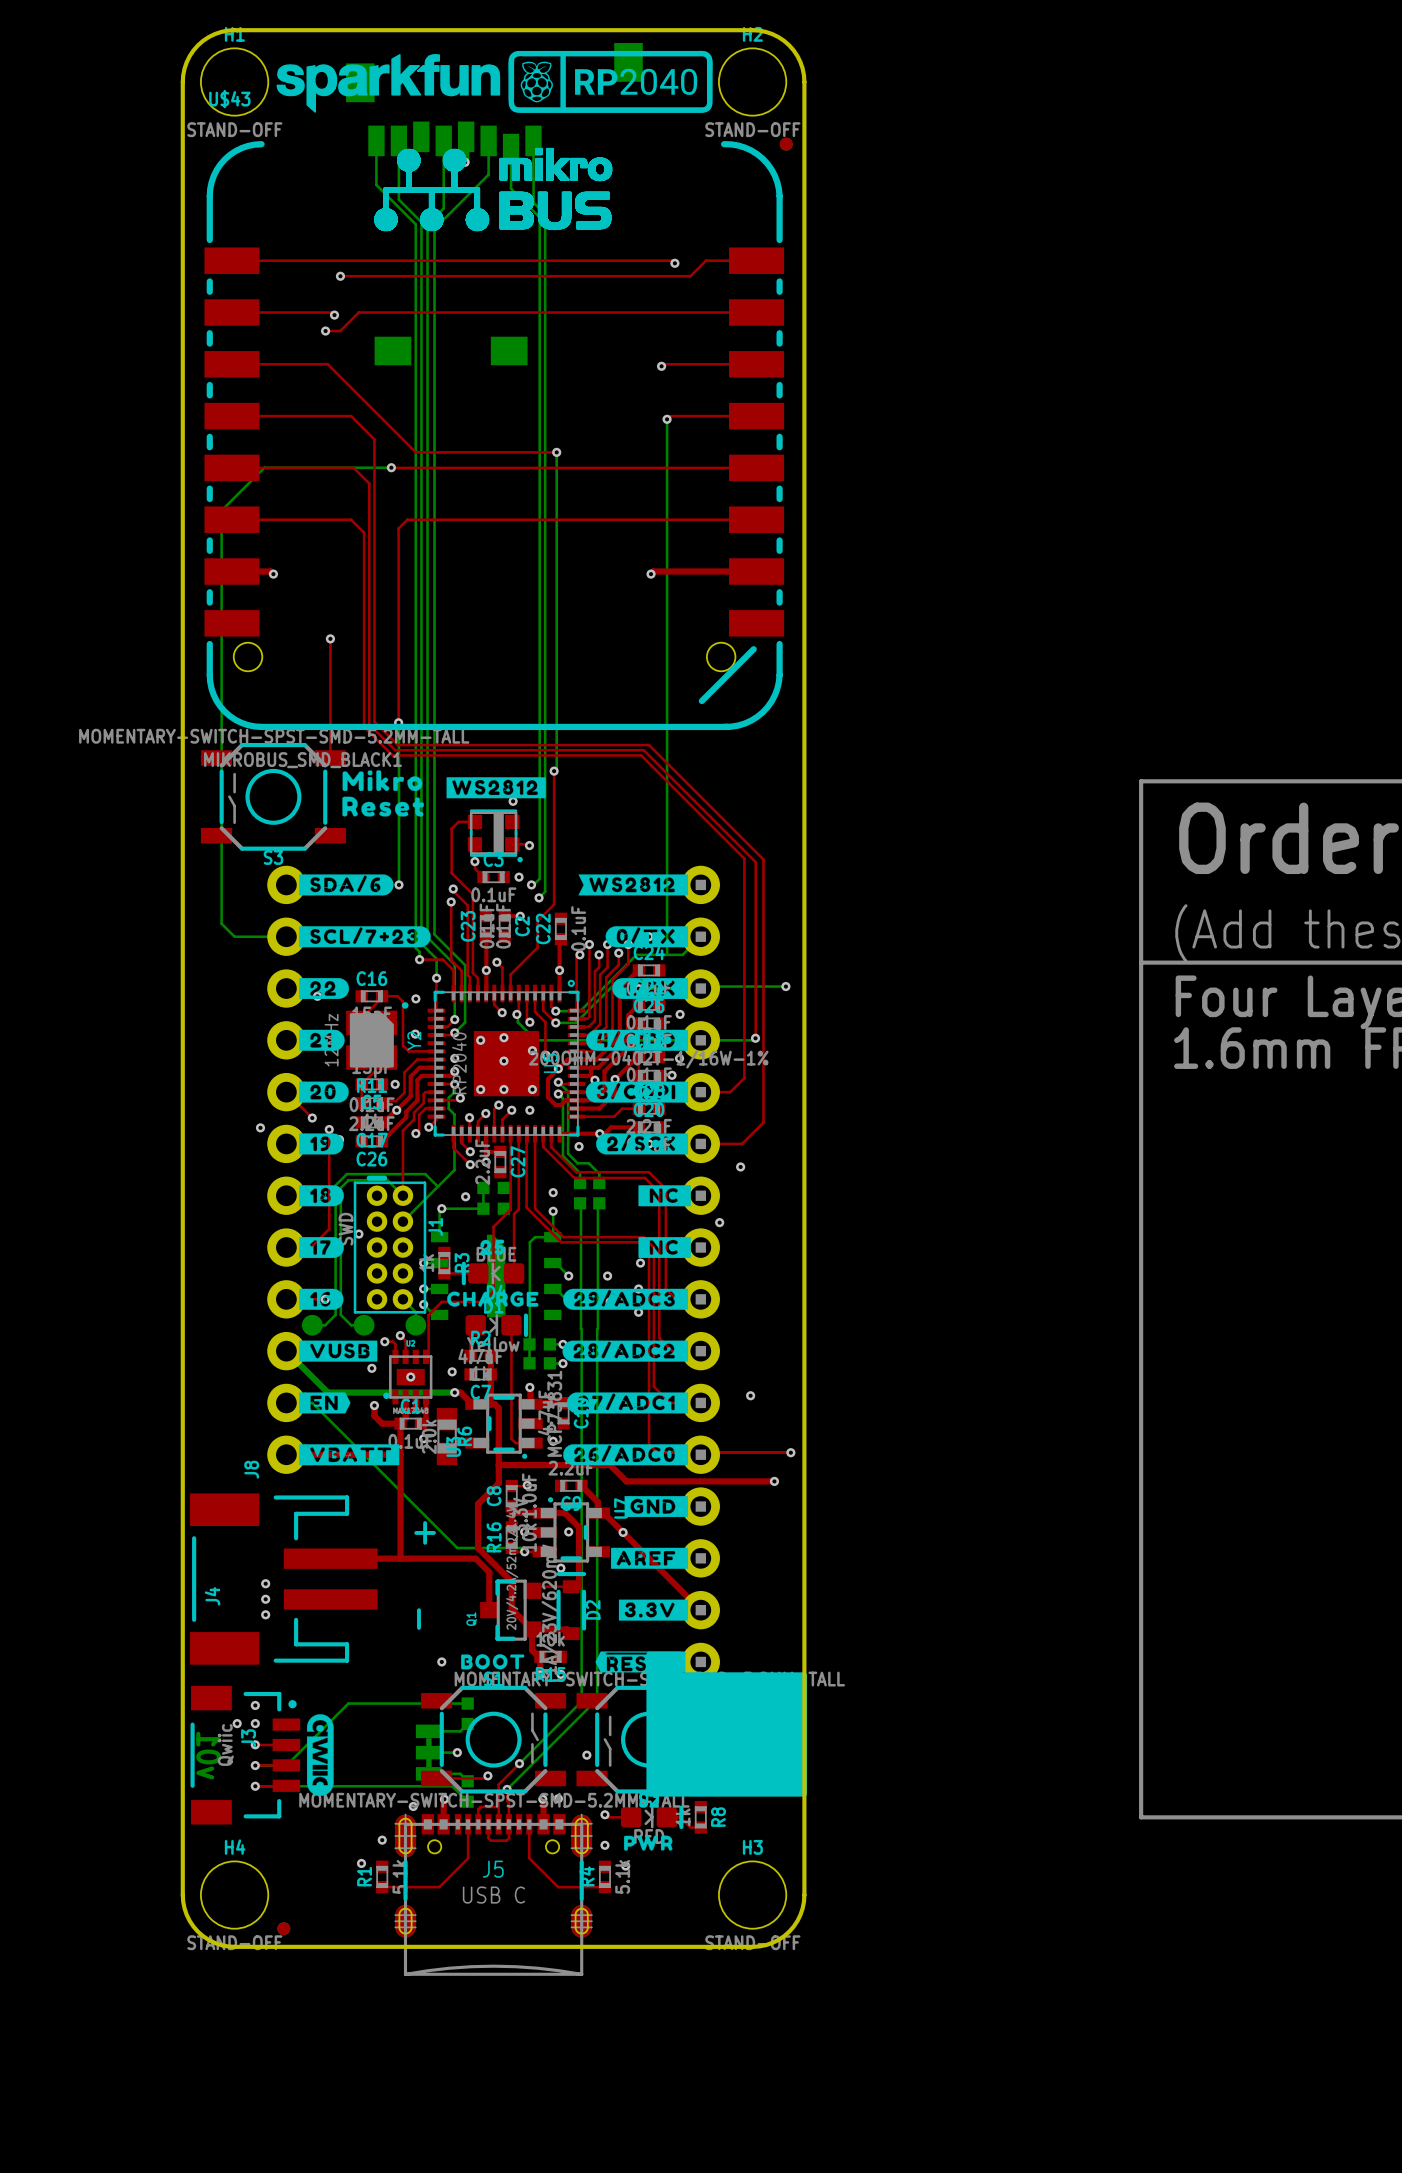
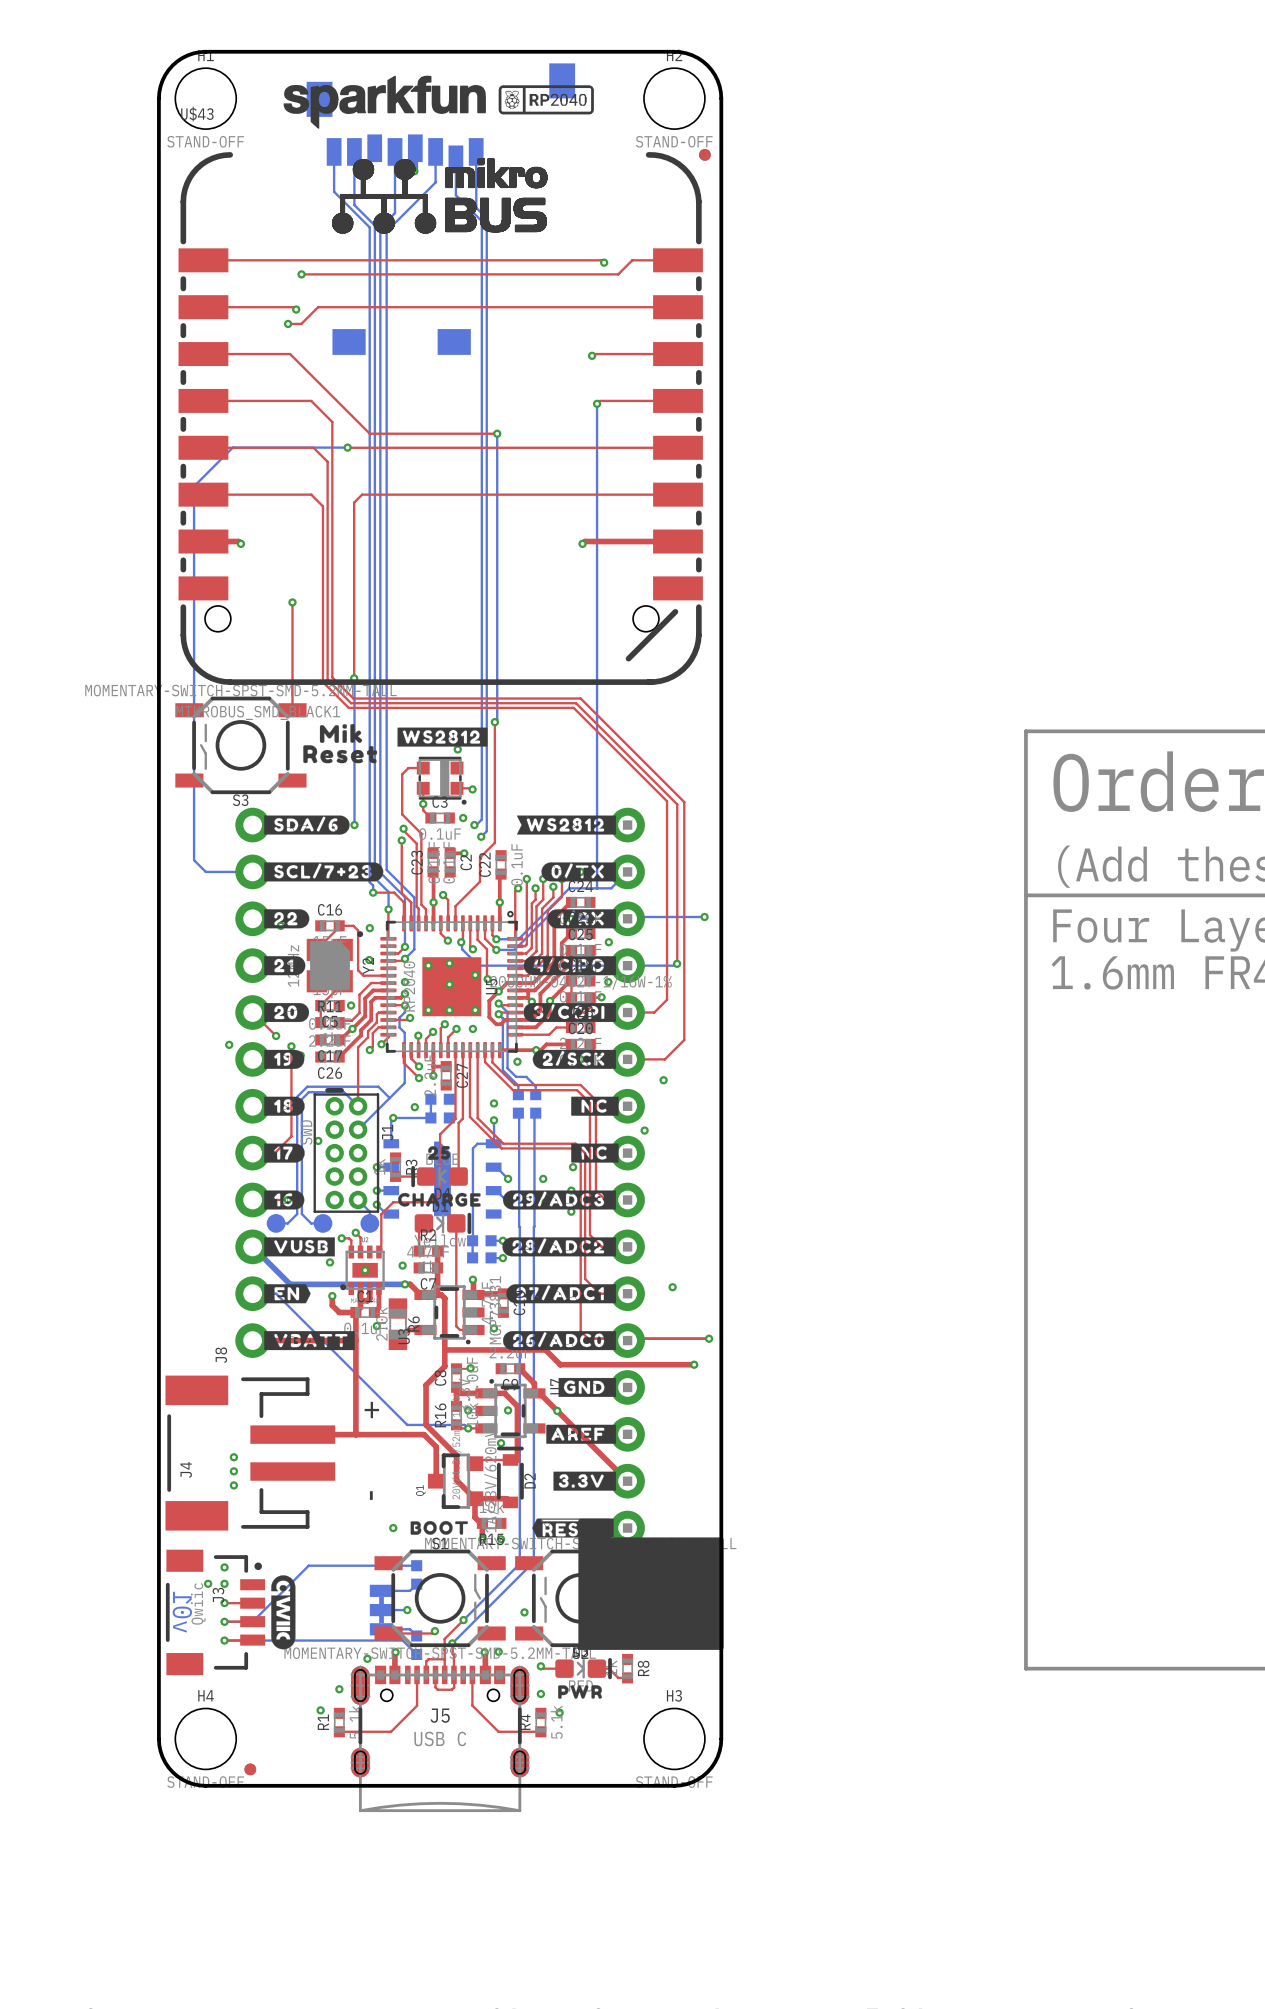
drawing shape: [508, 50, 713, 113] -> [498, 85, 594, 115]
drawing position: (388, 83) -> (384, 102)
drawing shape: [342, 770, 423, 792] -> [319, 724, 363, 743]

